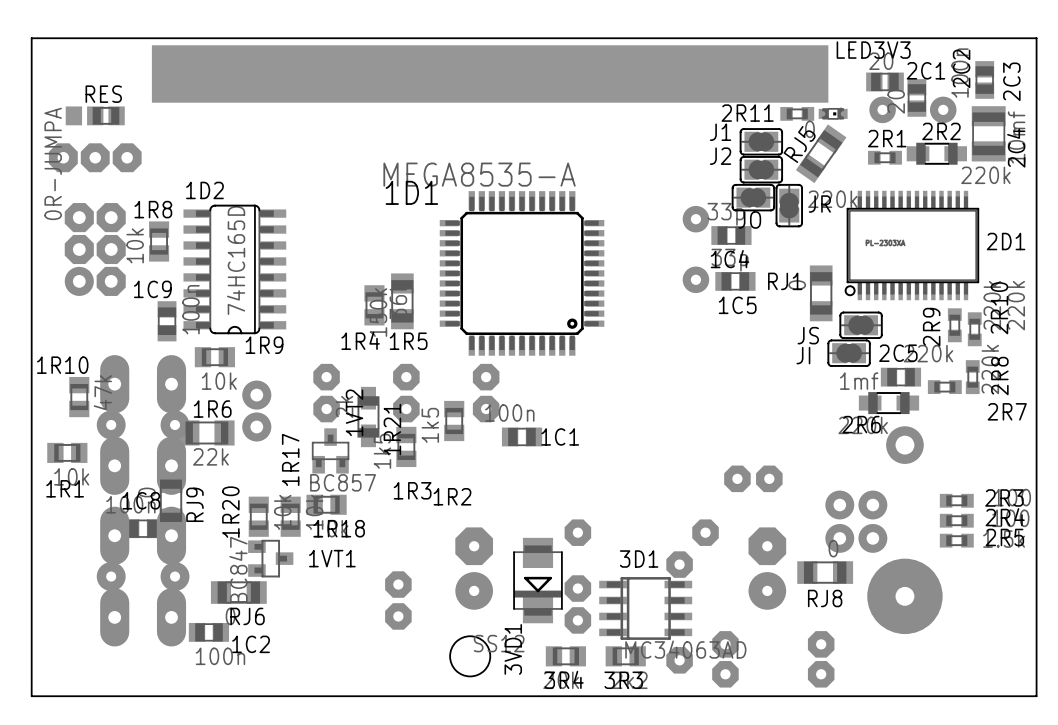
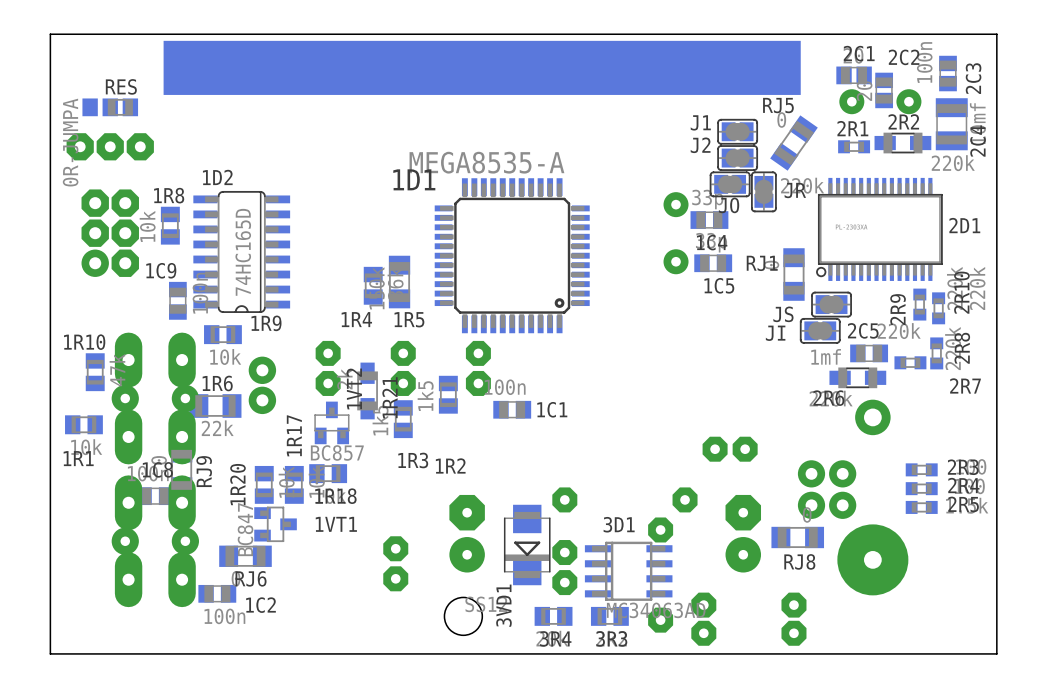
2C2 name rotation: 0° (961, 68) -> 90° clockwise (904, 57)
2C1 name position: 2C1 (925, 70) -> 2C1 (859, 53)
2R11: (797, 113) -> none
LED3V3: (833, 113) -> none
RJ5 name rotation: 0° (799, 144) -> 55° clockwise (778, 105)

